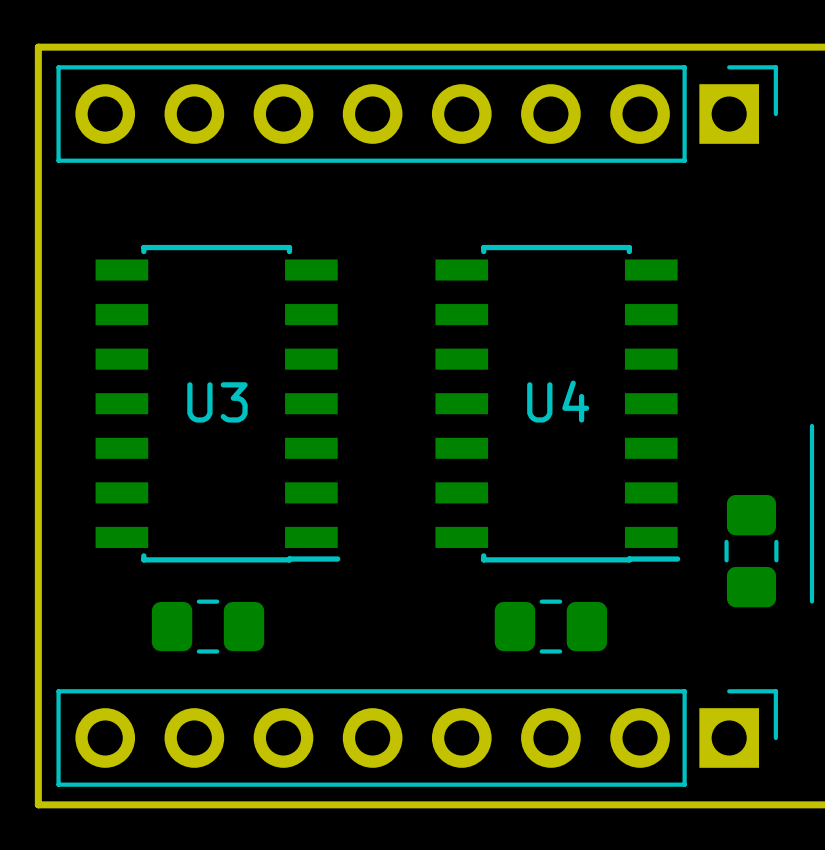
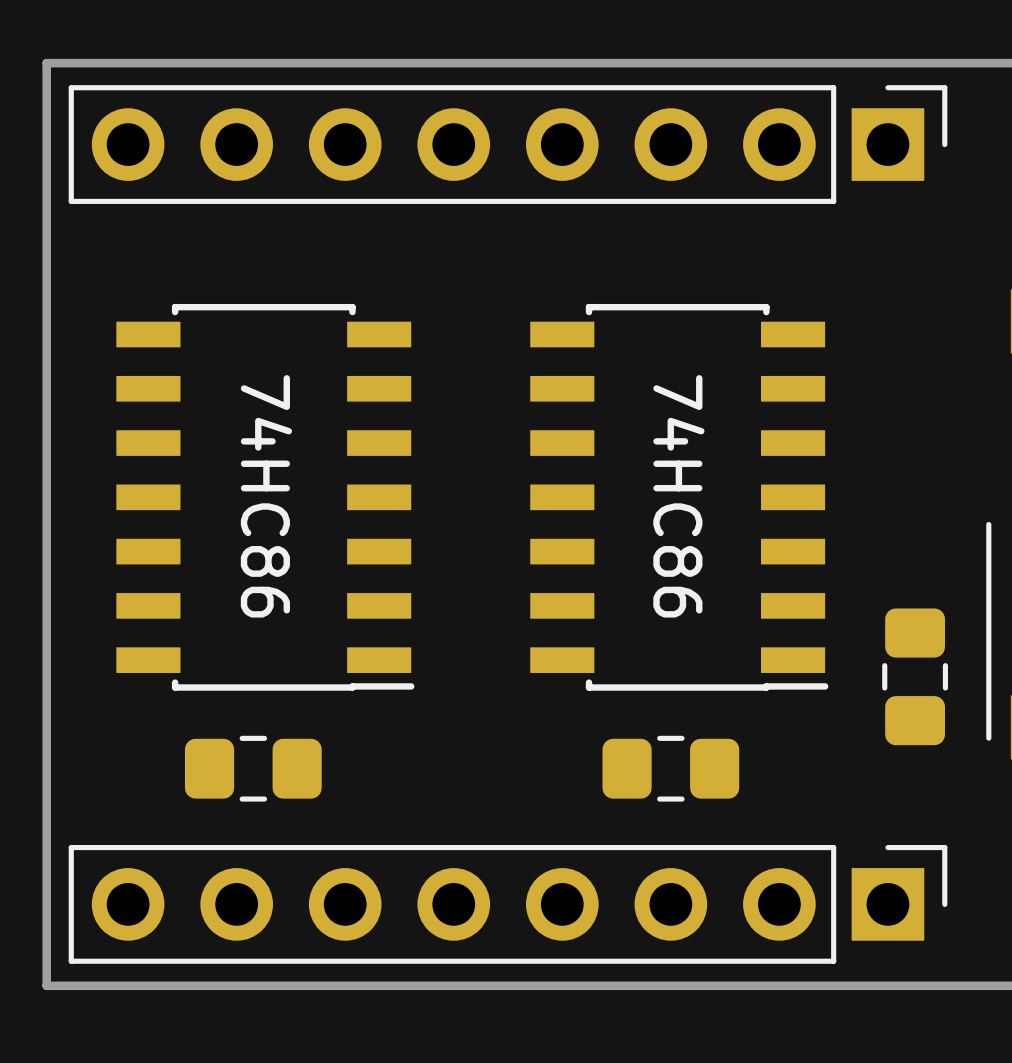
U4 name: U4 (558, 401) -> none
U3 name: U3 (217, 402) -> none
U3 value: none -> 74HC86 (266, 496)
U4 value: none -> 74HC86 (678, 496)

